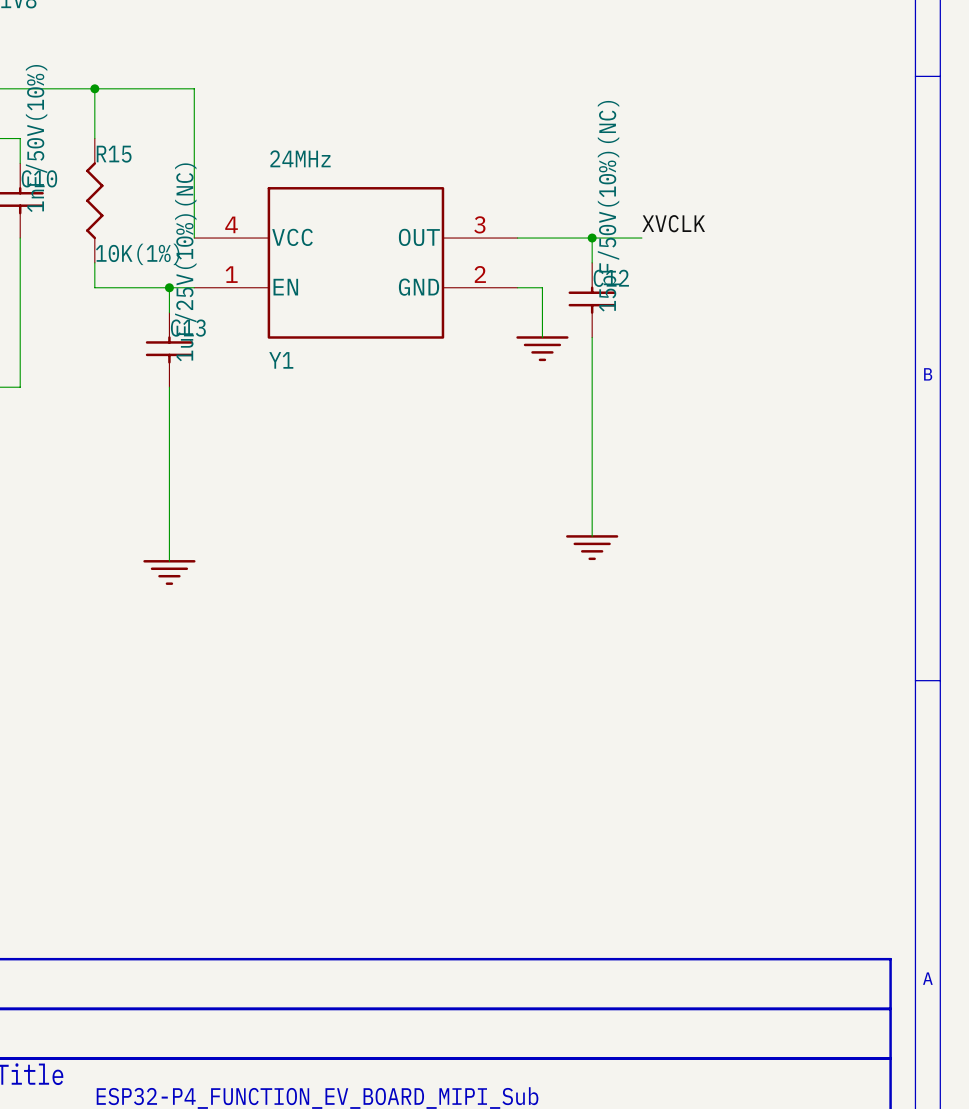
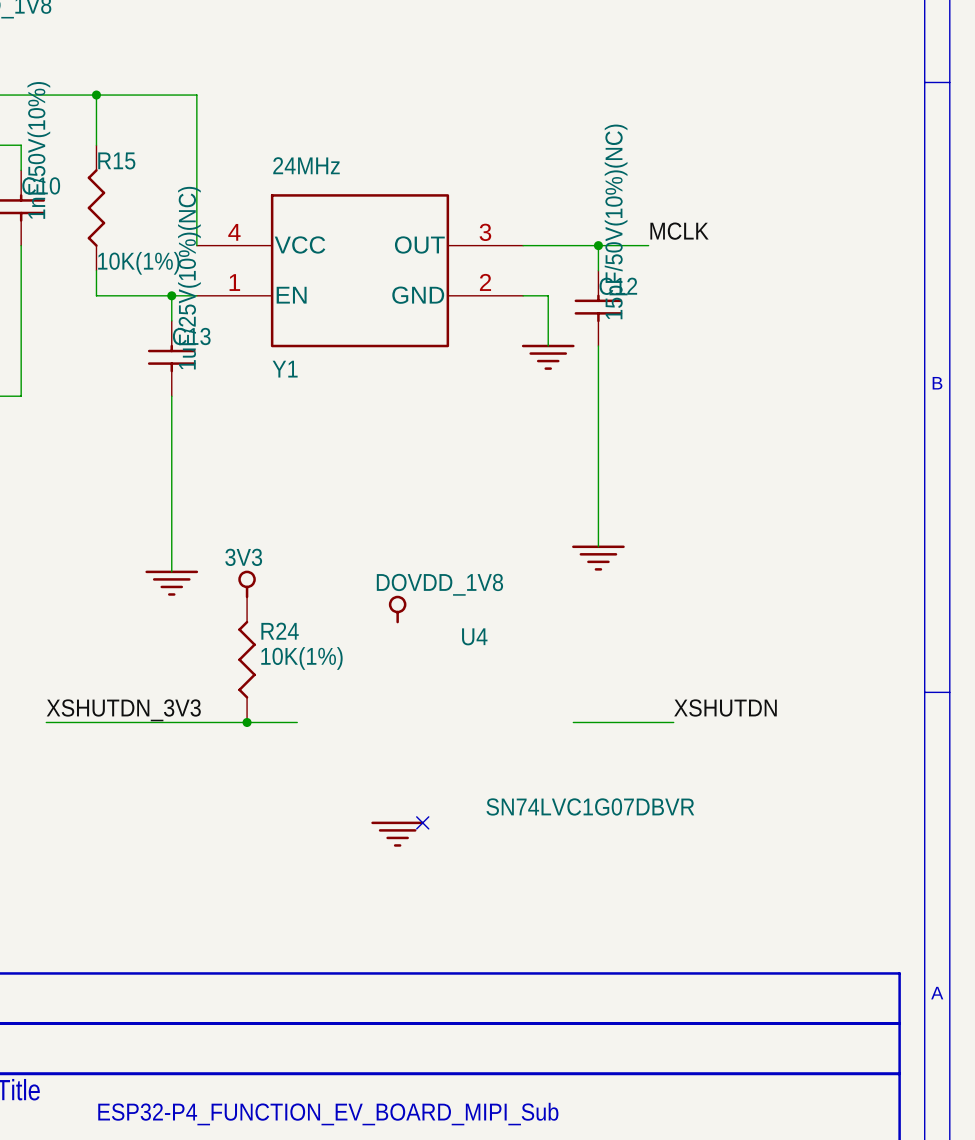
label: XVCLK (673, 223) -> MCLK (679, 231)
power symbol: none -> (247, 584)
power symbol: none -> (397, 609)
R24: none -> 10K(1%) (247, 659)
label: none -> XSHUTDN (725, 708)
label: none -> XSHUTDN_3V3 (123, 710)
wire: none -> (46, 722) (297, 722)
junction: none -> (247, 722)
U4: none -> SN74LVC1G07DBVR (578, 721)
wire: none -> (573, 722) (673, 722)
no-connect mark: none -> (422, 822)
power symbol: none -> (397, 834)

